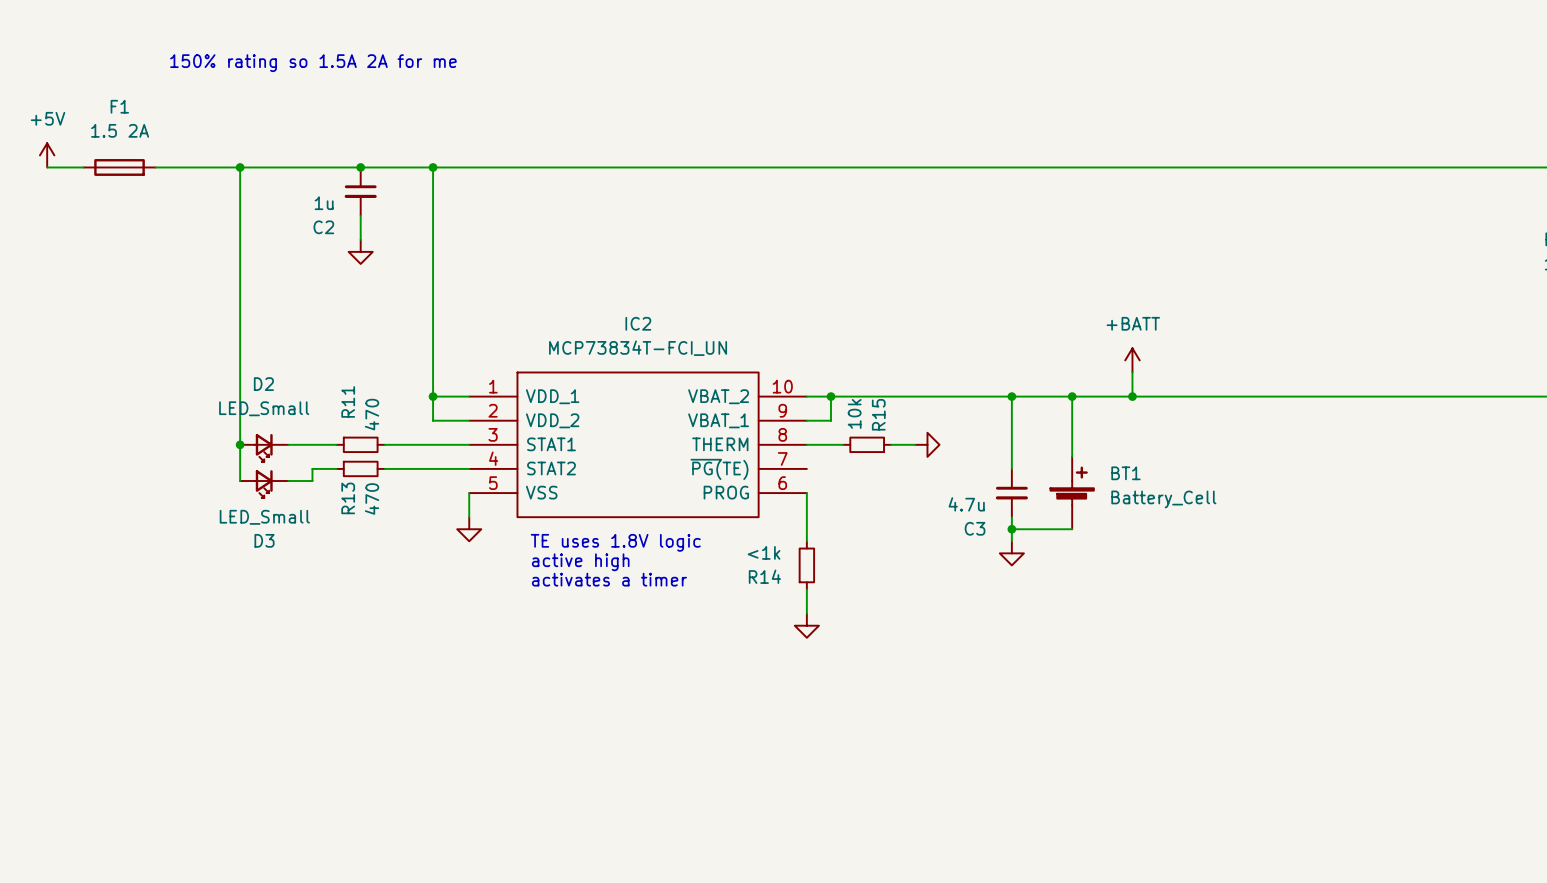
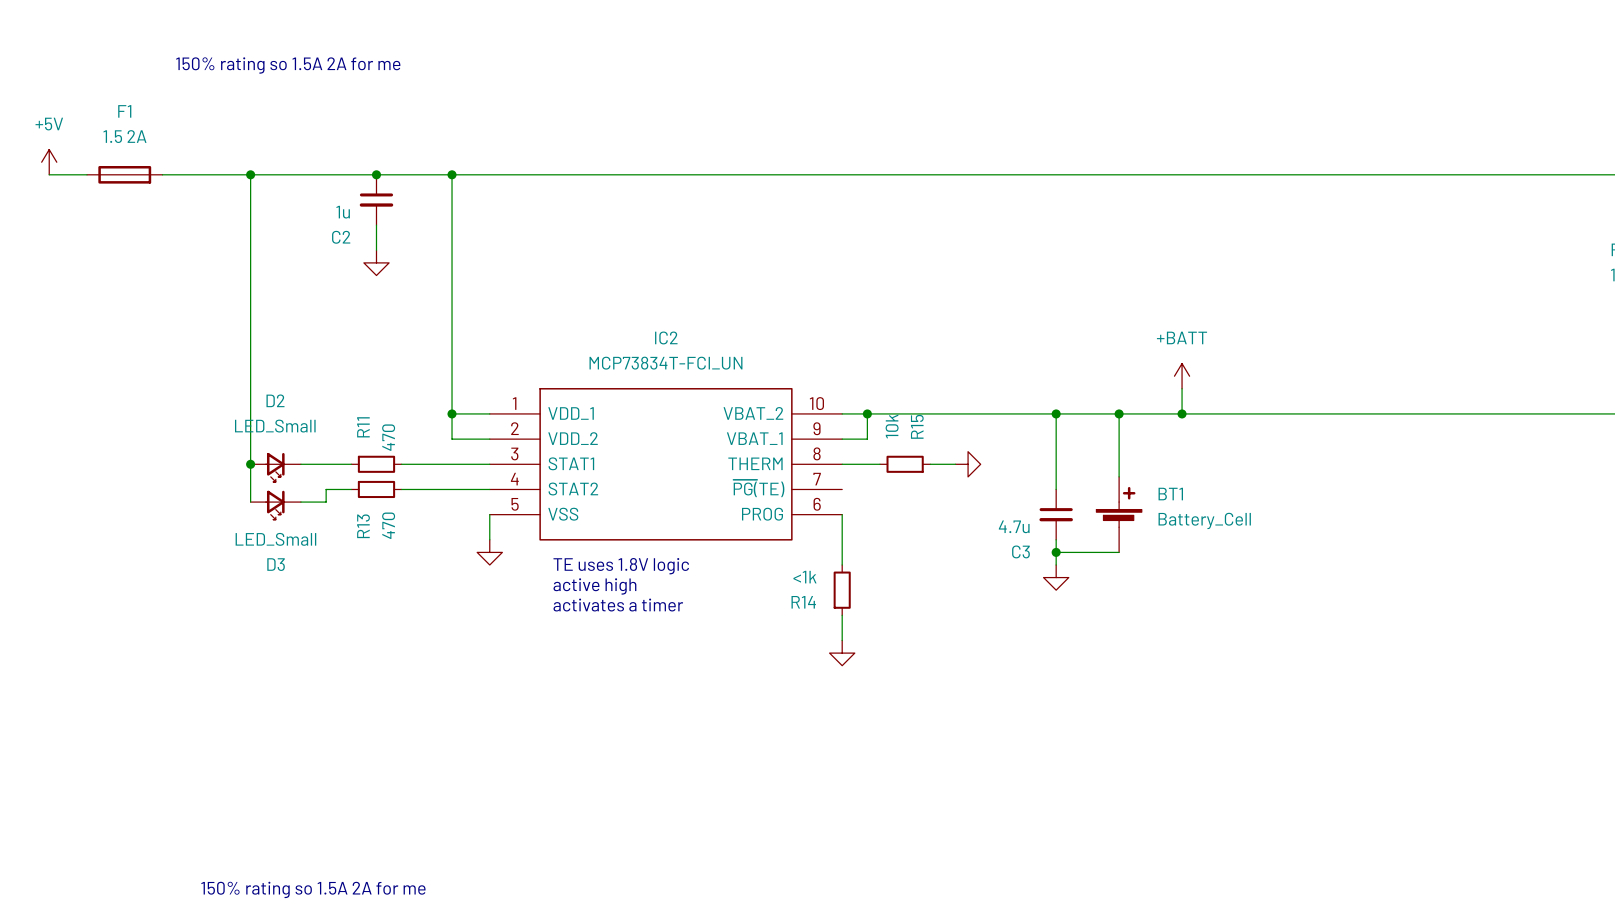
text: none -> 150% rating so 1.5A 2A for me (313, 889)

